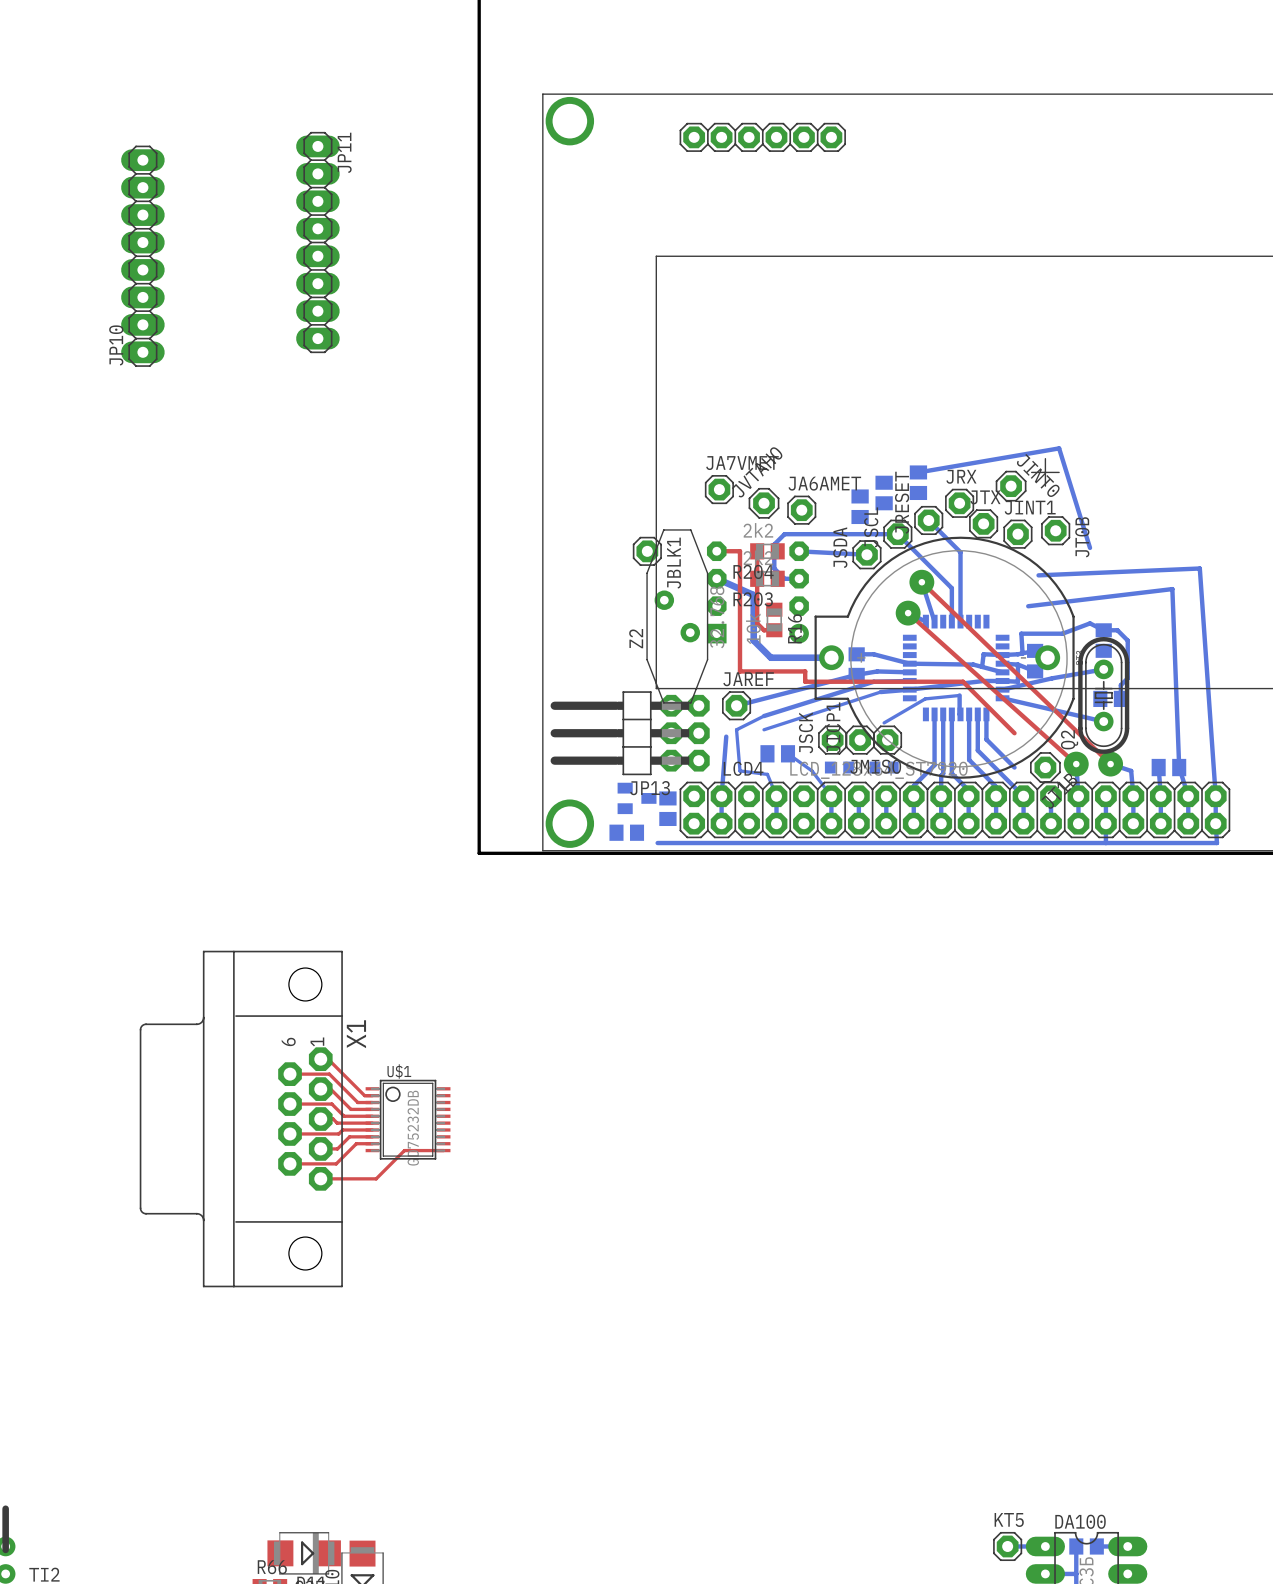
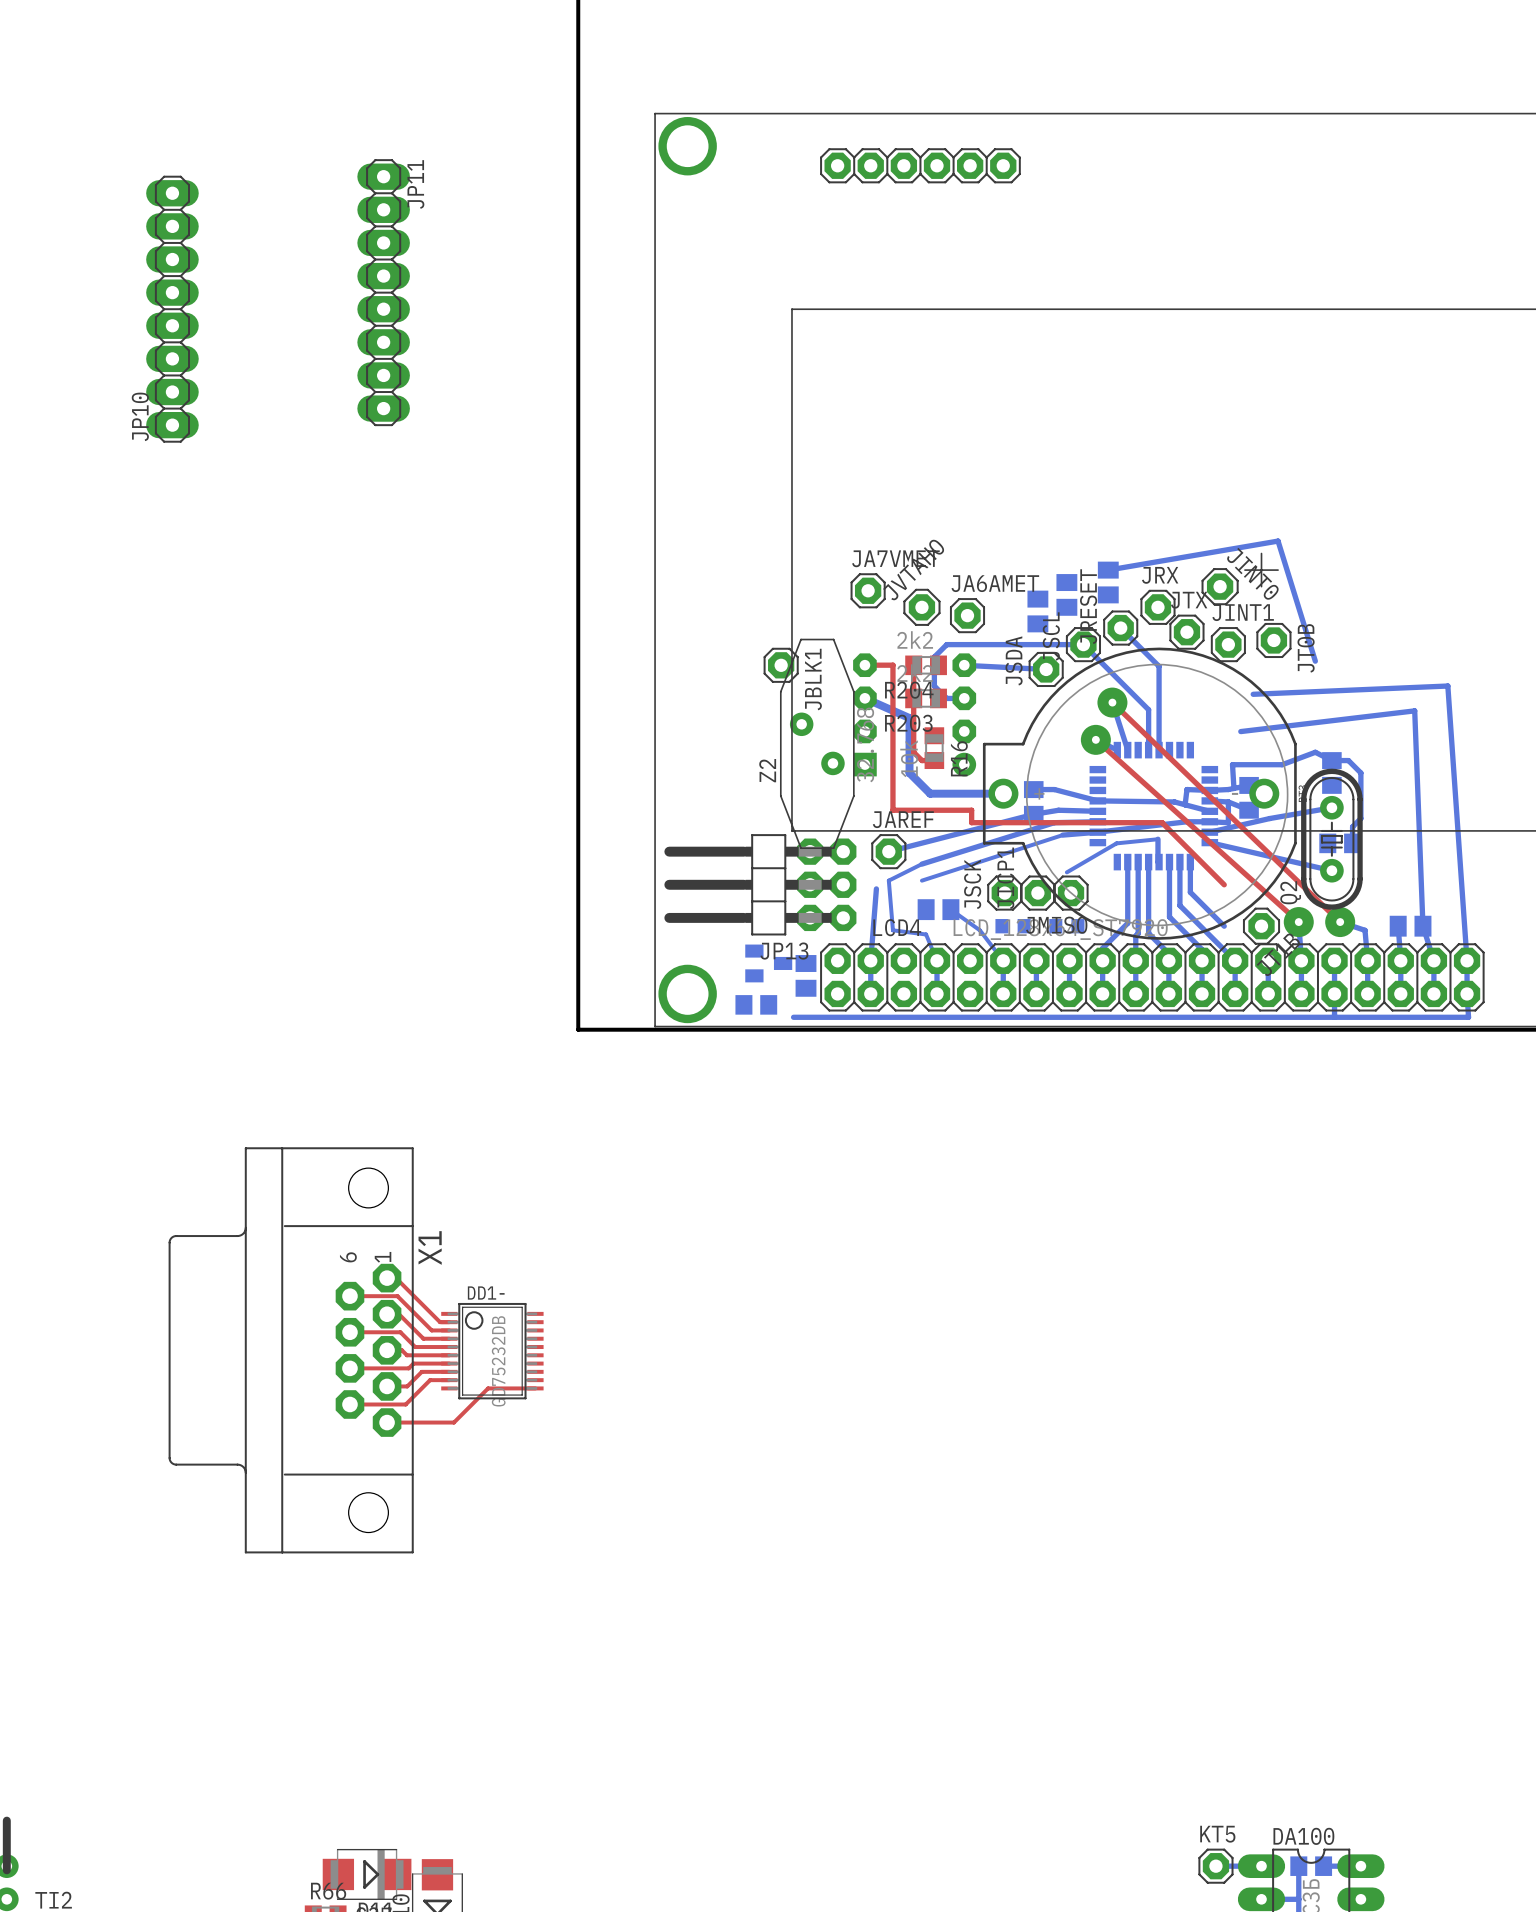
U$1 name: U$1 (399, 1071) -> DD1- (486, 1293)

